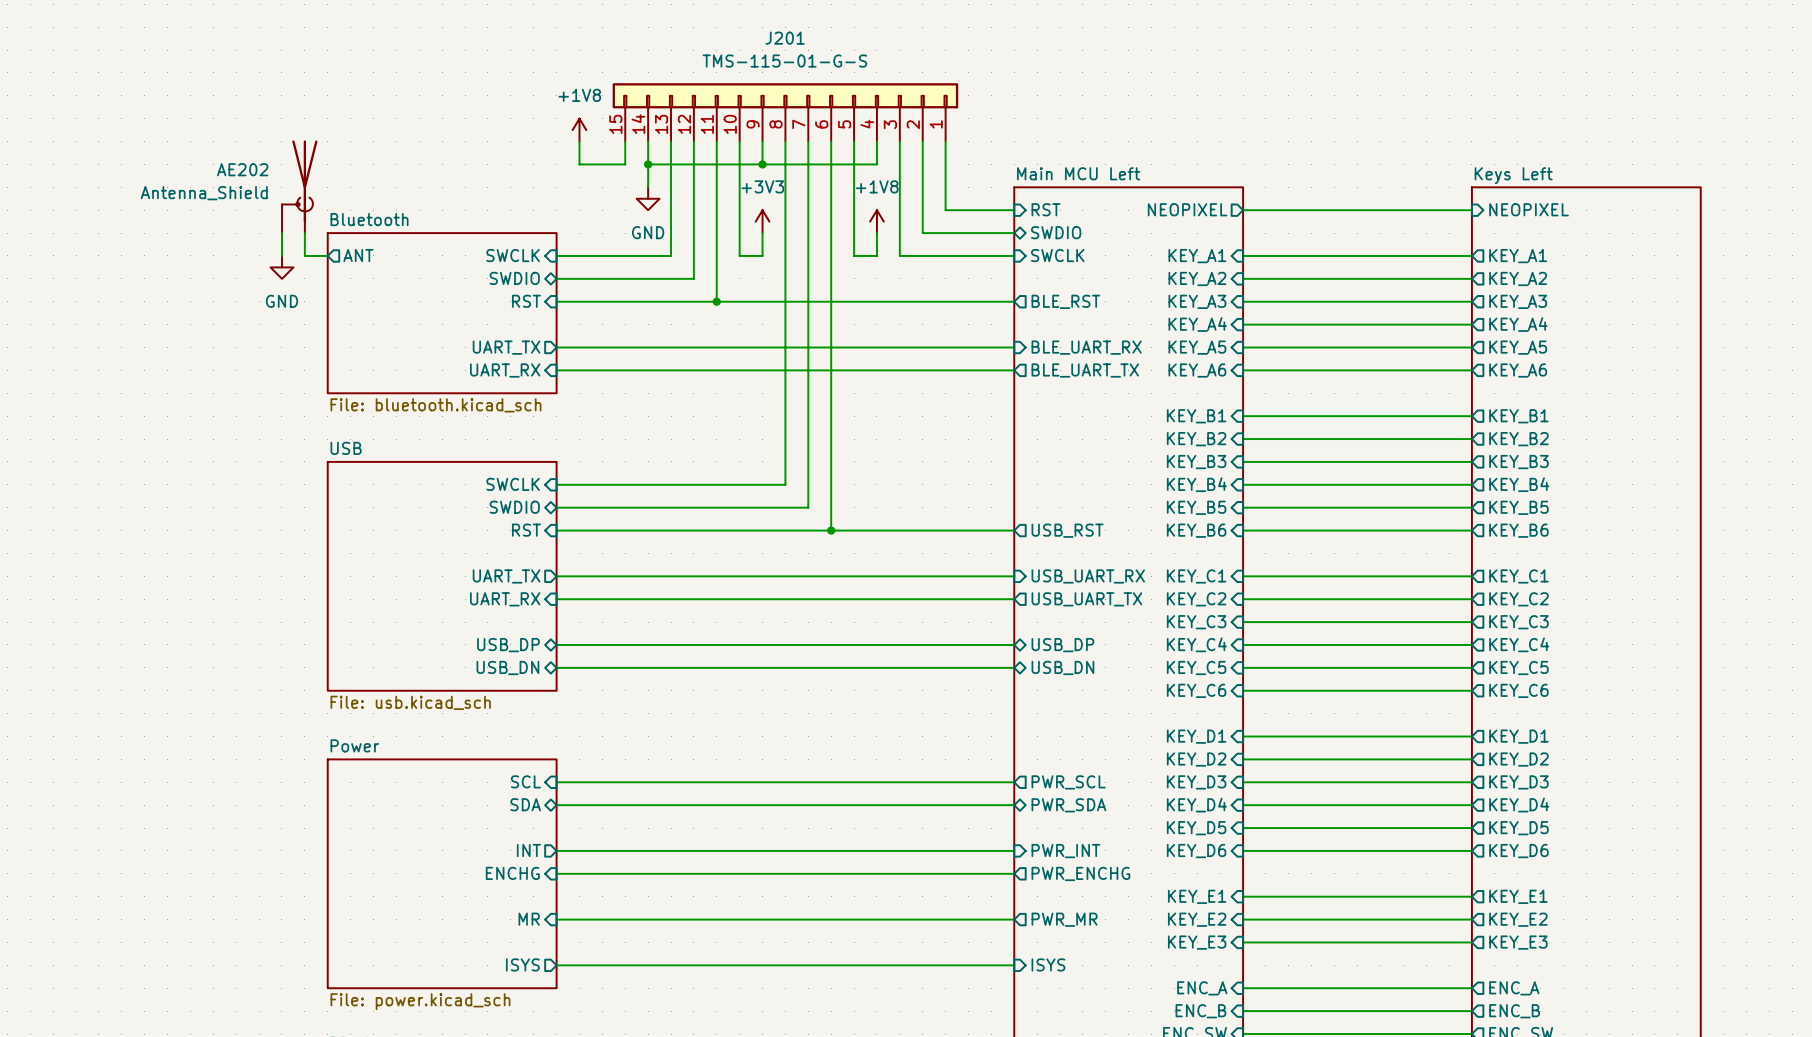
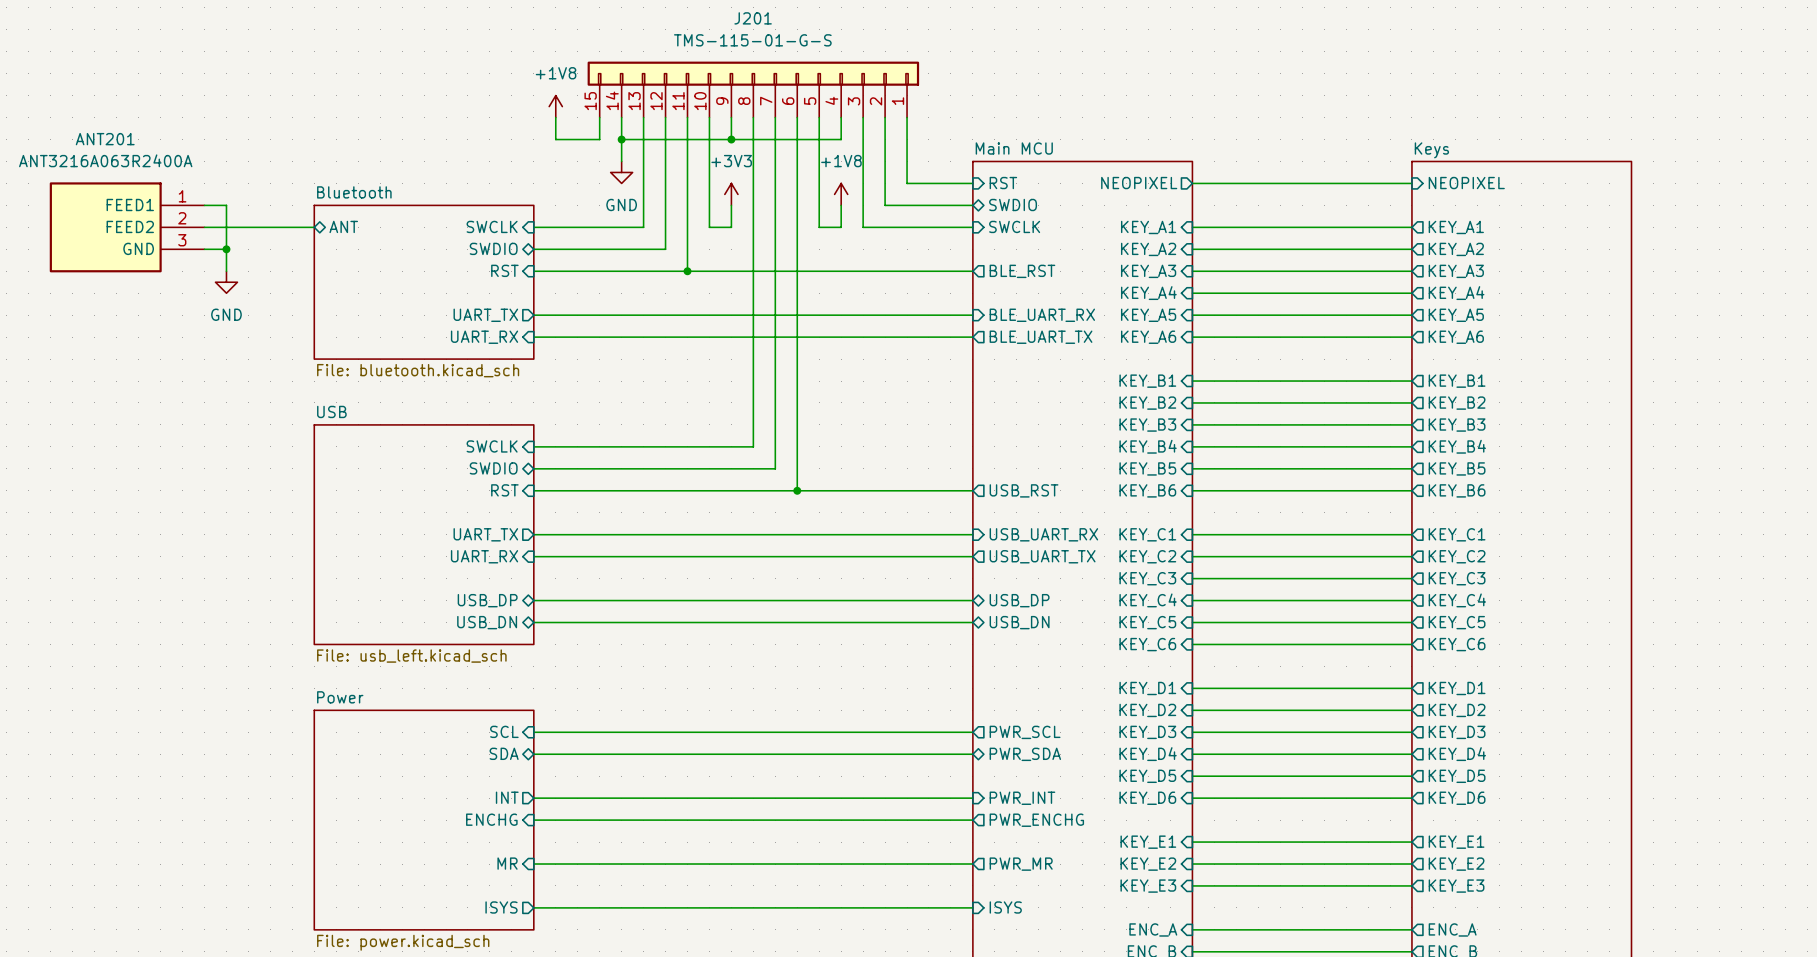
sheet Main MCU Left name: Main MCU Left (1078, 173) -> Main MCU (1014, 148)
sheet Keys Left name: Keys Left (1513, 175) -> Keys (1431, 150)
AE202: Antenna_Shield (299, 186) -> none
wire: none -> (204, 205) (226, 205) (226, 271)
wire: (281, 233) (281, 255) -> none
wire: (304, 233) (304, 255) -> (204, 227) (292, 227)
ANT201: none -> ANT3216A063R2400A (127, 227)
sheet pin shape: output (358, 255) -> bidirectional (343, 226)
power symbol position: GND (281, 267) -> GND (226, 282)
wire: none -> (204, 249) (226, 249)
junction: none -> (226, 249)
sheet USB value: File: usb.kicad_sch (410, 702) -> File: usb_left.kicad_sch (411, 656)

